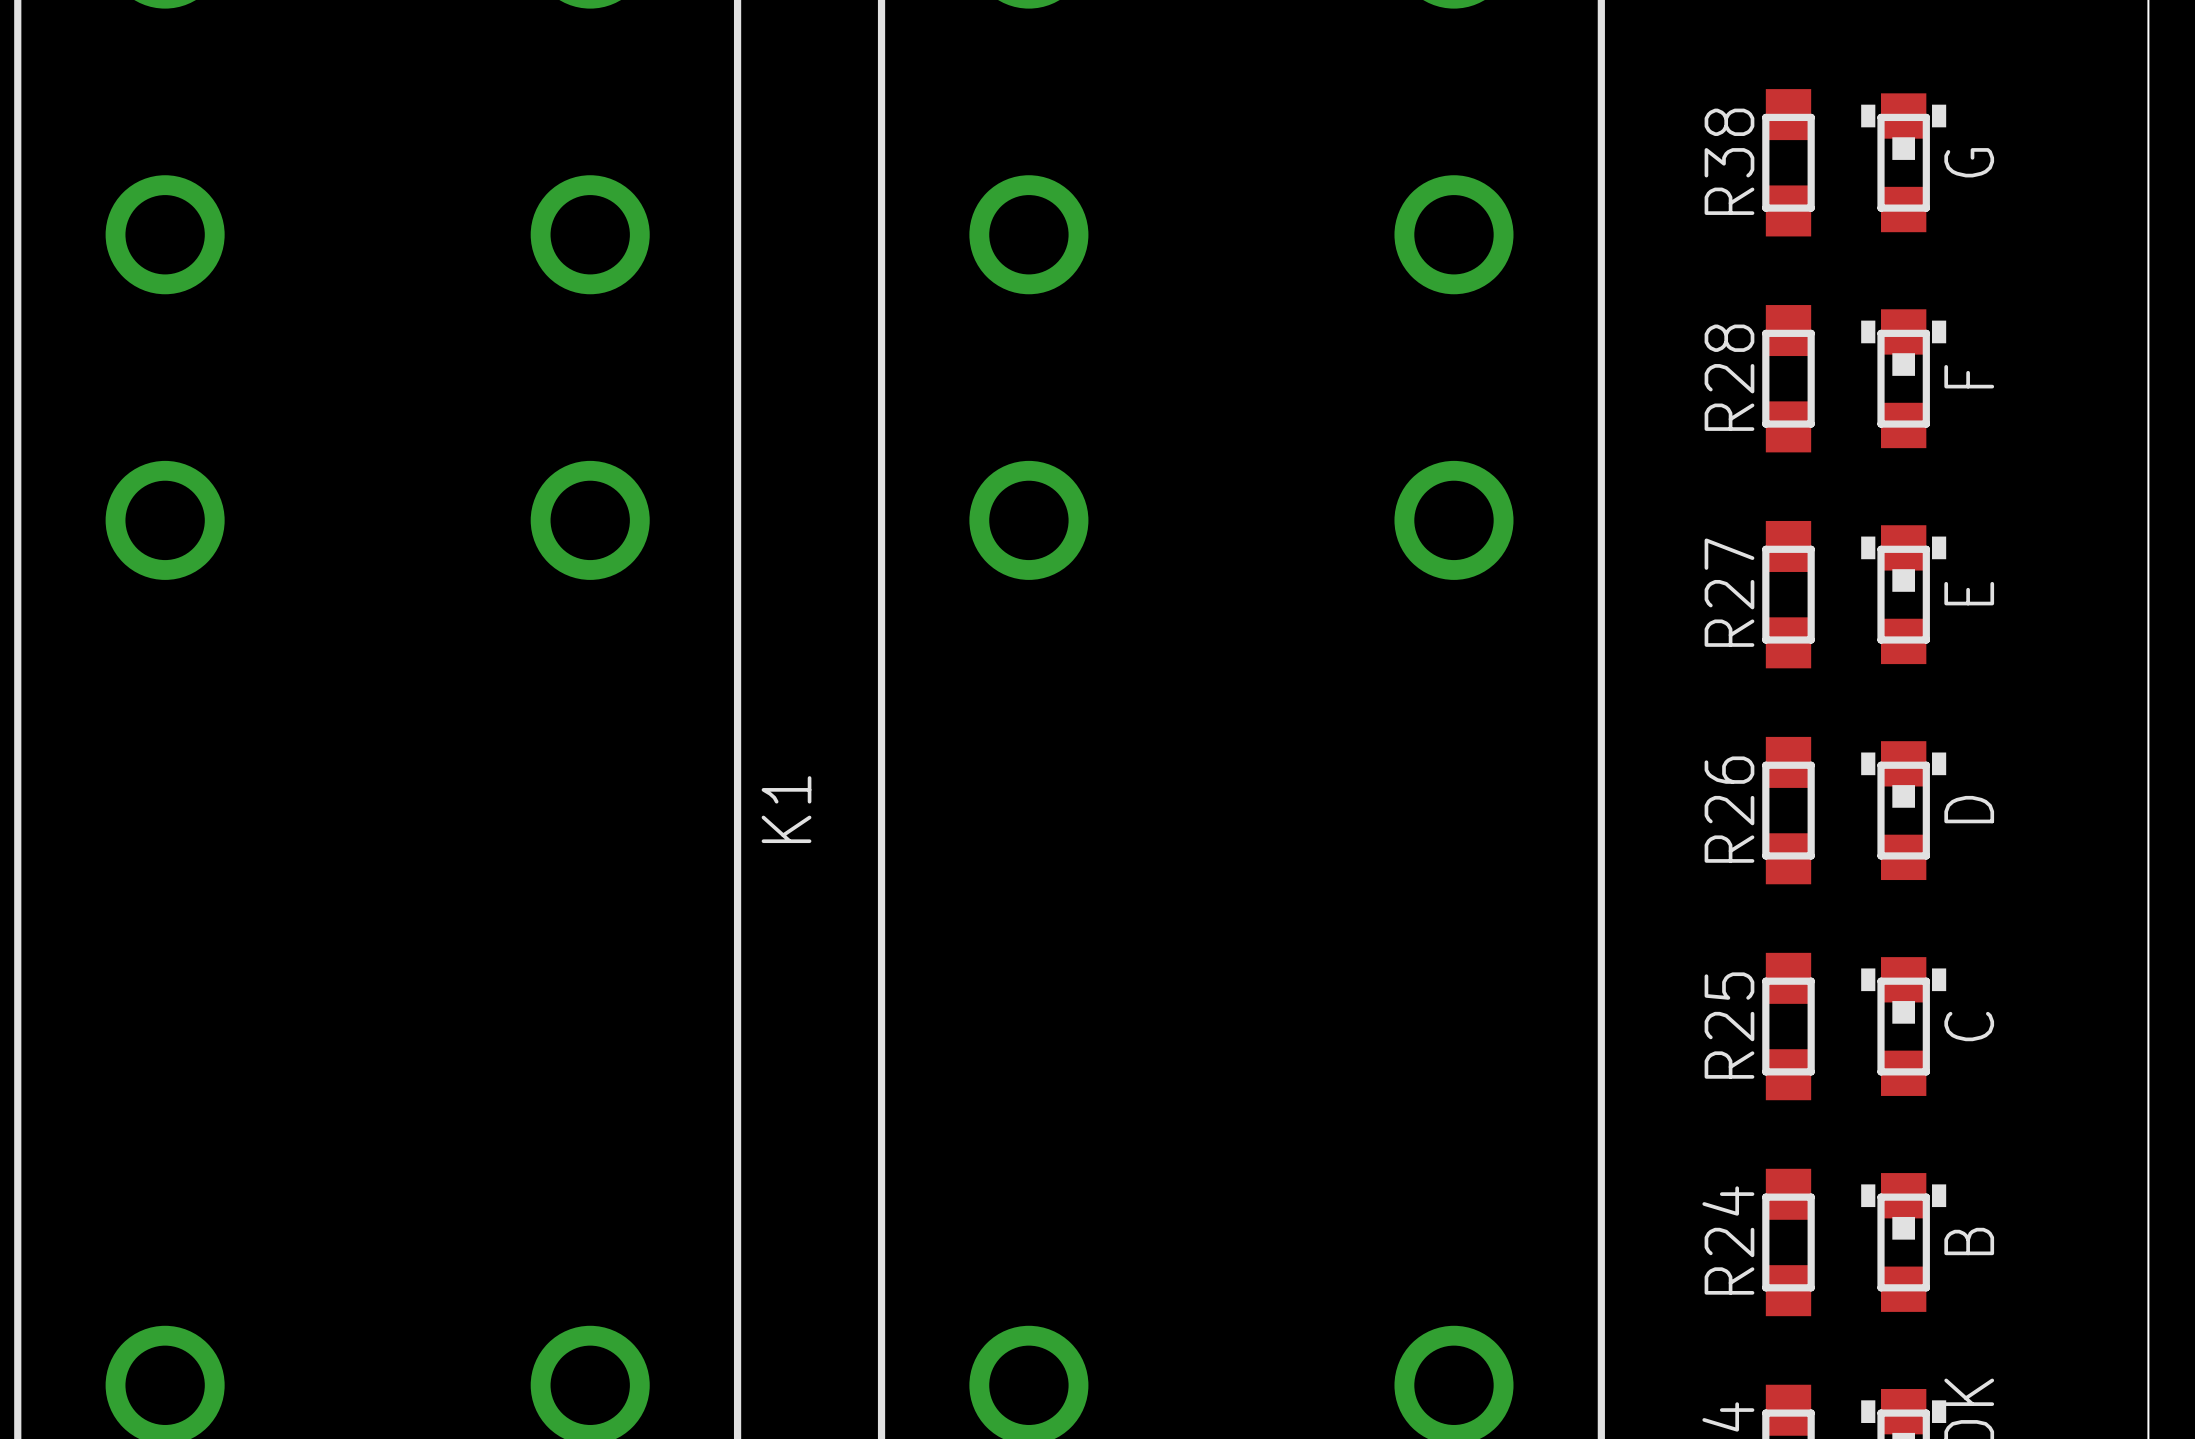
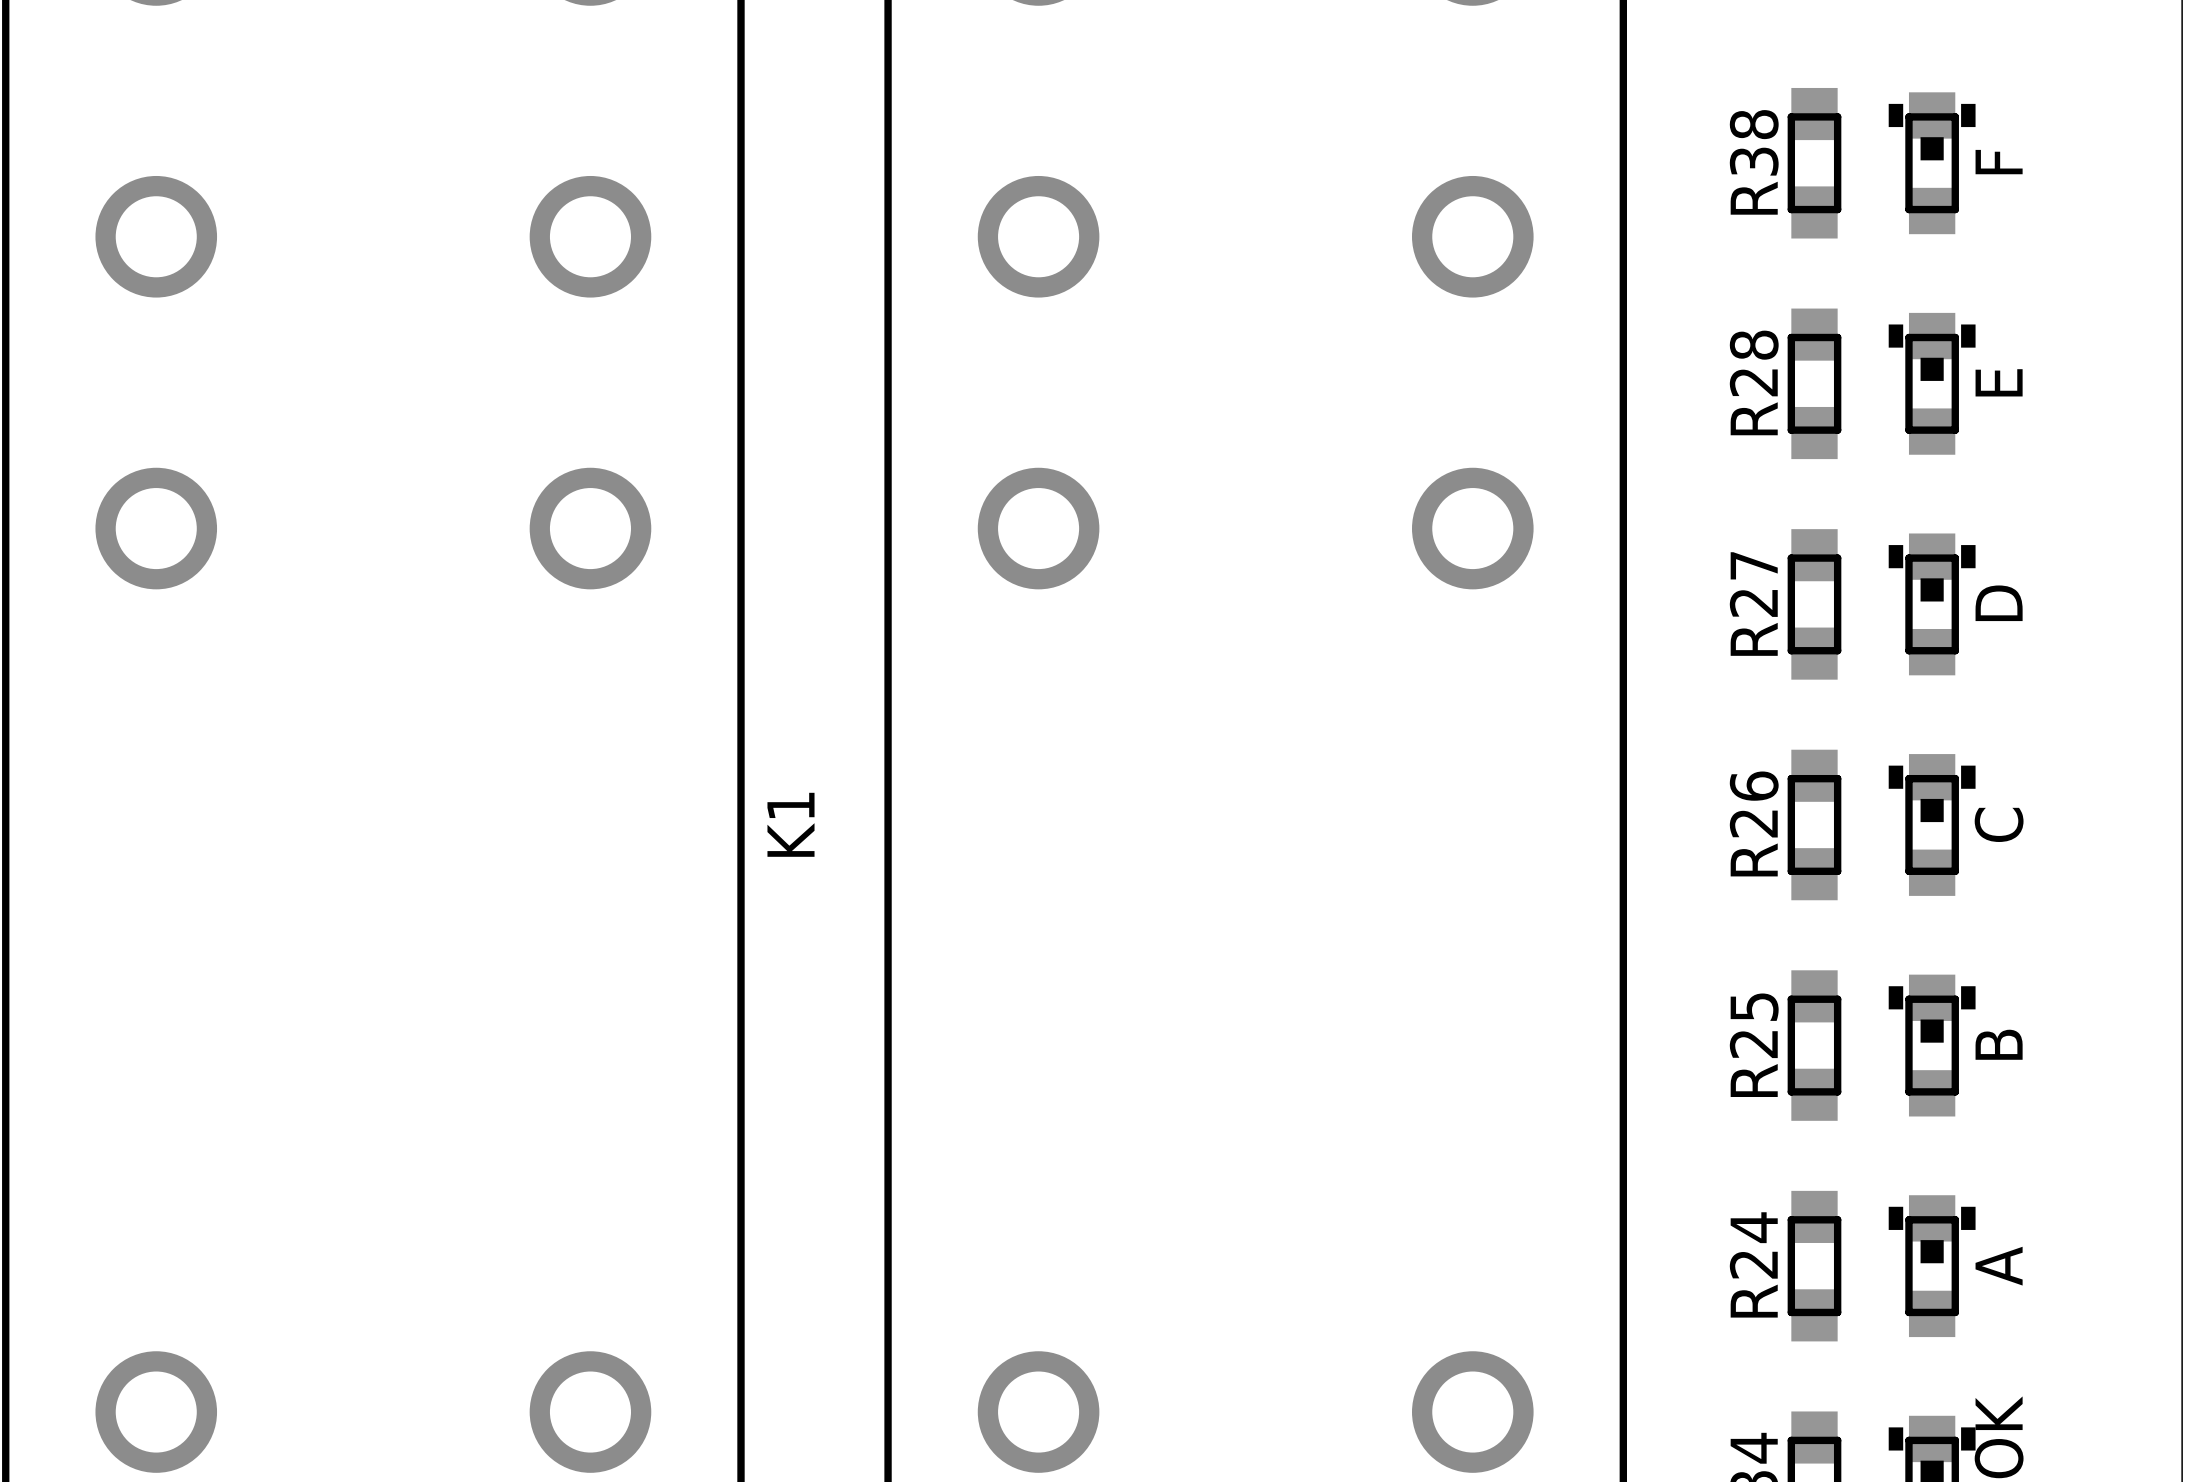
G name: G (1969, 162) -> F (1999, 162)
F name: F (1969, 376) -> E (1999, 382)
E name: E (1969, 593) -> D (1999, 603)
D name: D (1969, 809) -> C (1999, 824)
C name: C (1969, 1026) -> B (1999, 1044)
B name: B (1969, 1241) -> A (1999, 1266)

